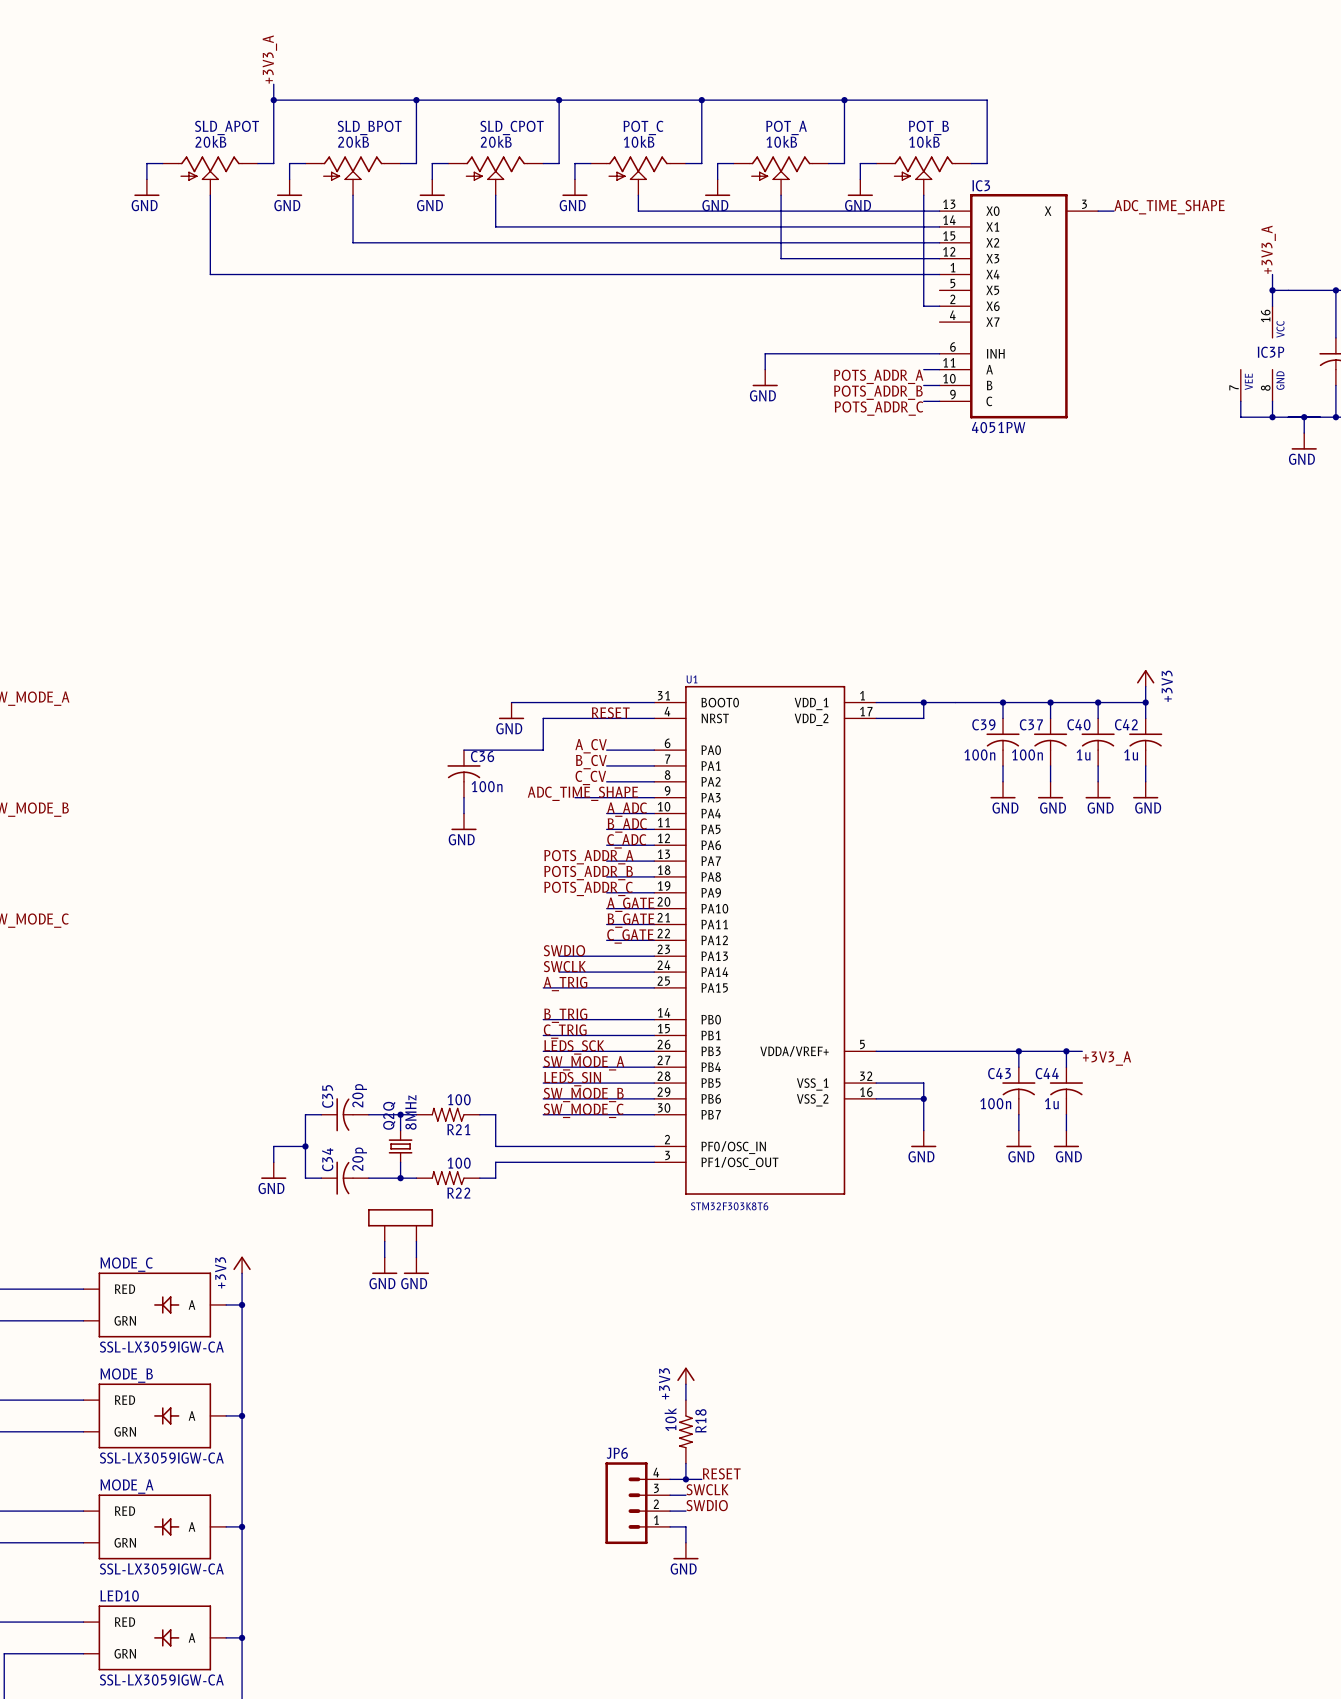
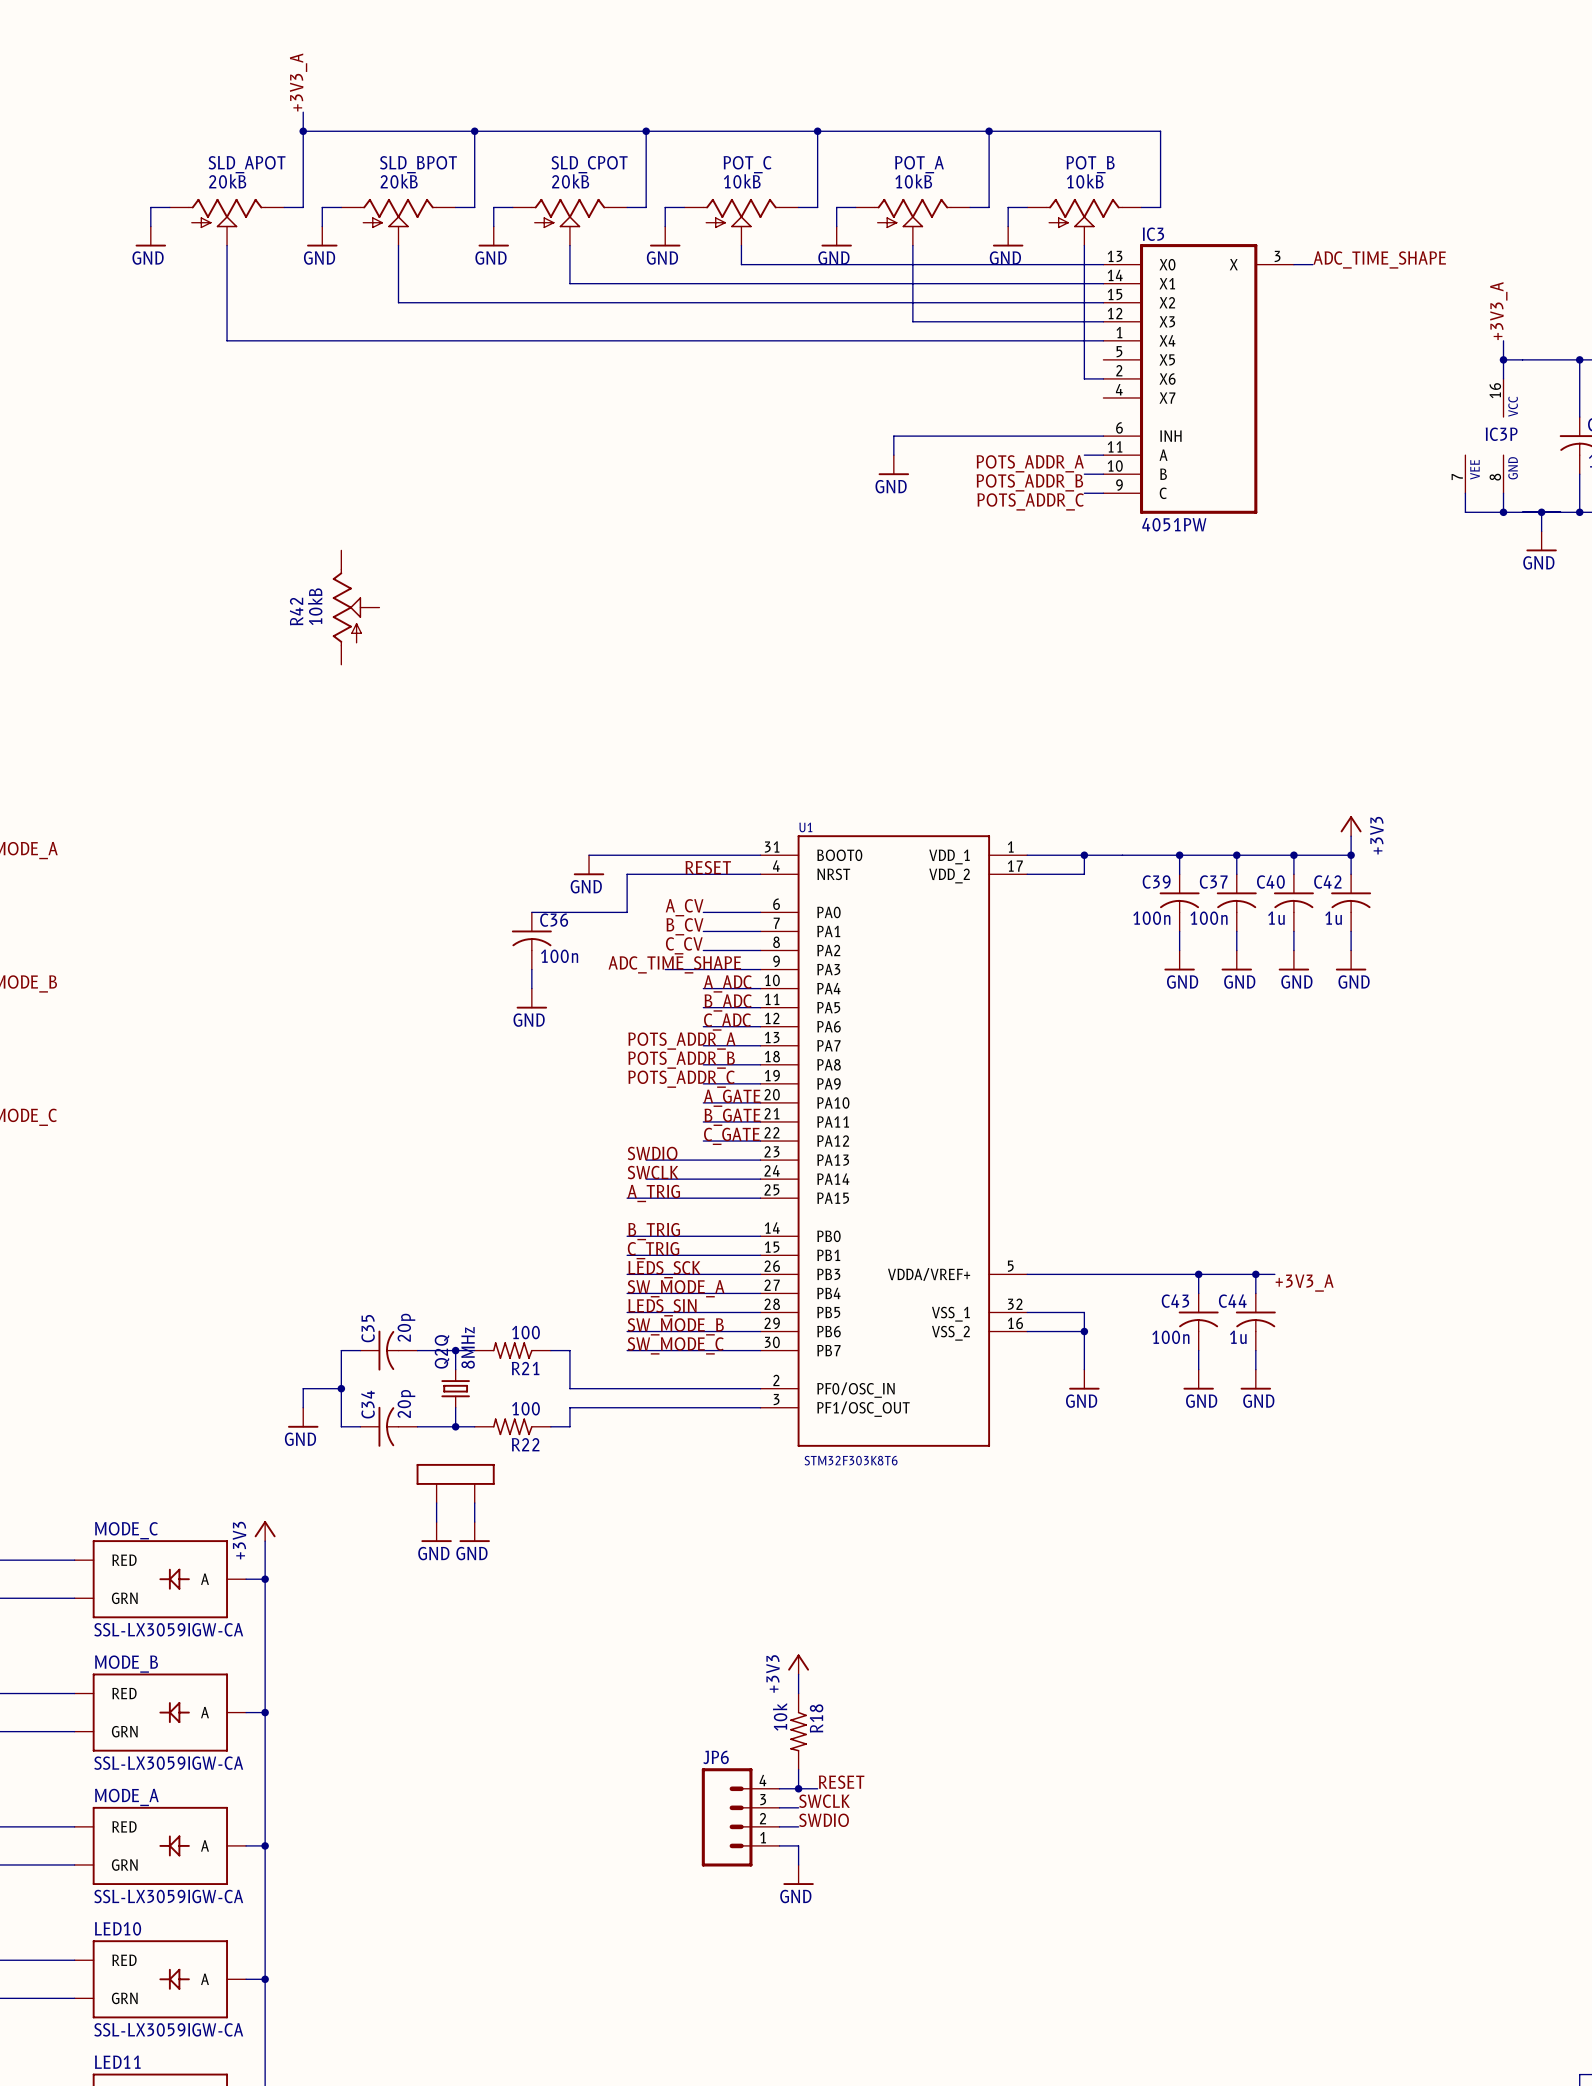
R42: none -> 10kB (356, 607)

